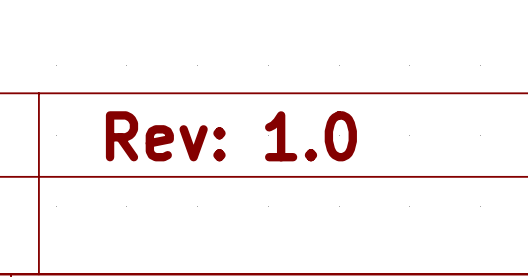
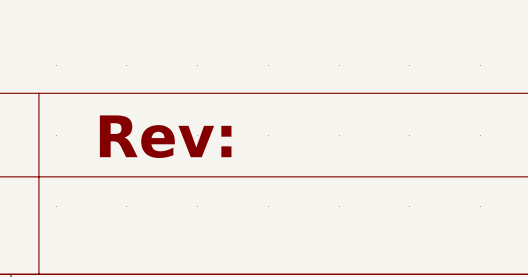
title block: Rev: 1.0 (231, 136) -> Rev: (165, 136)

